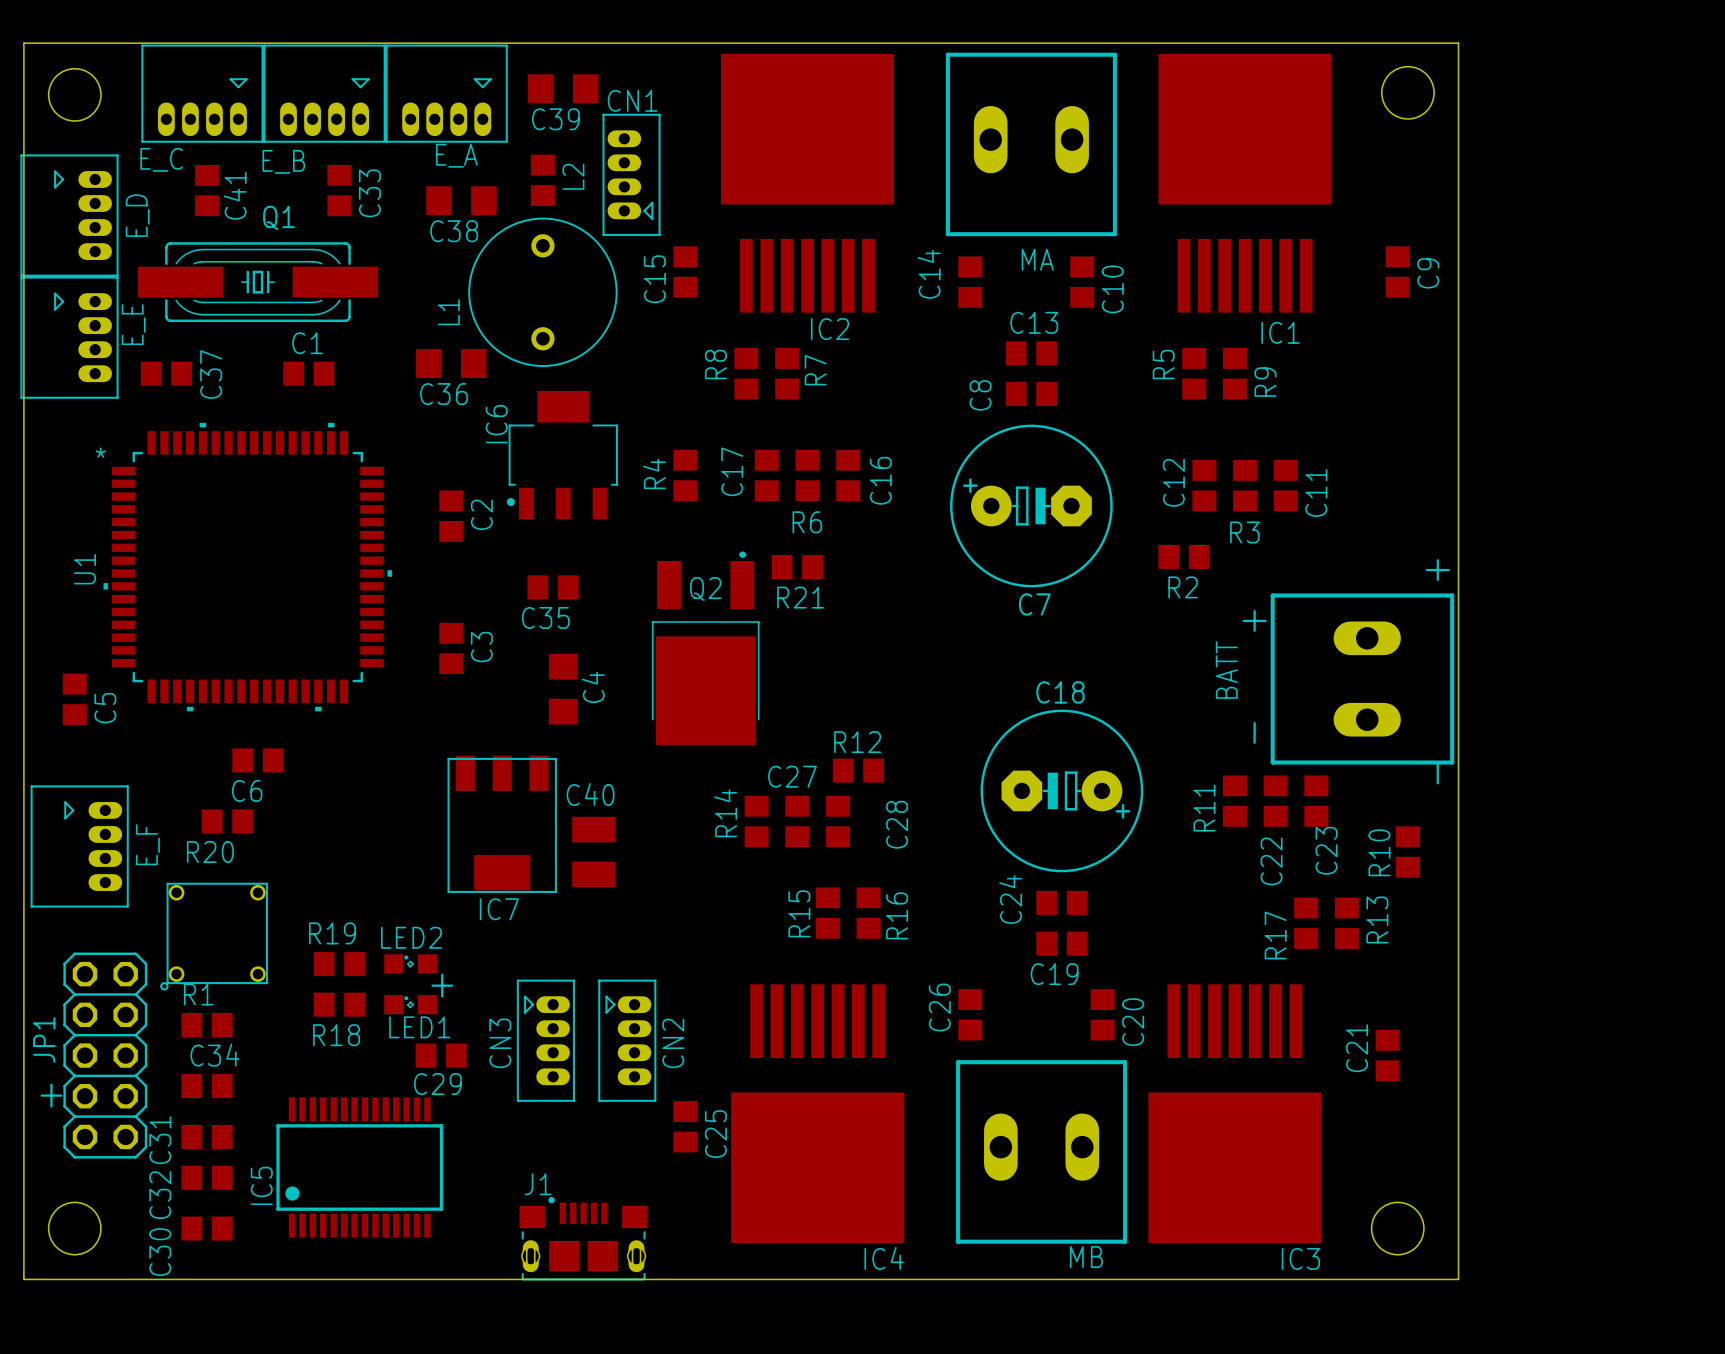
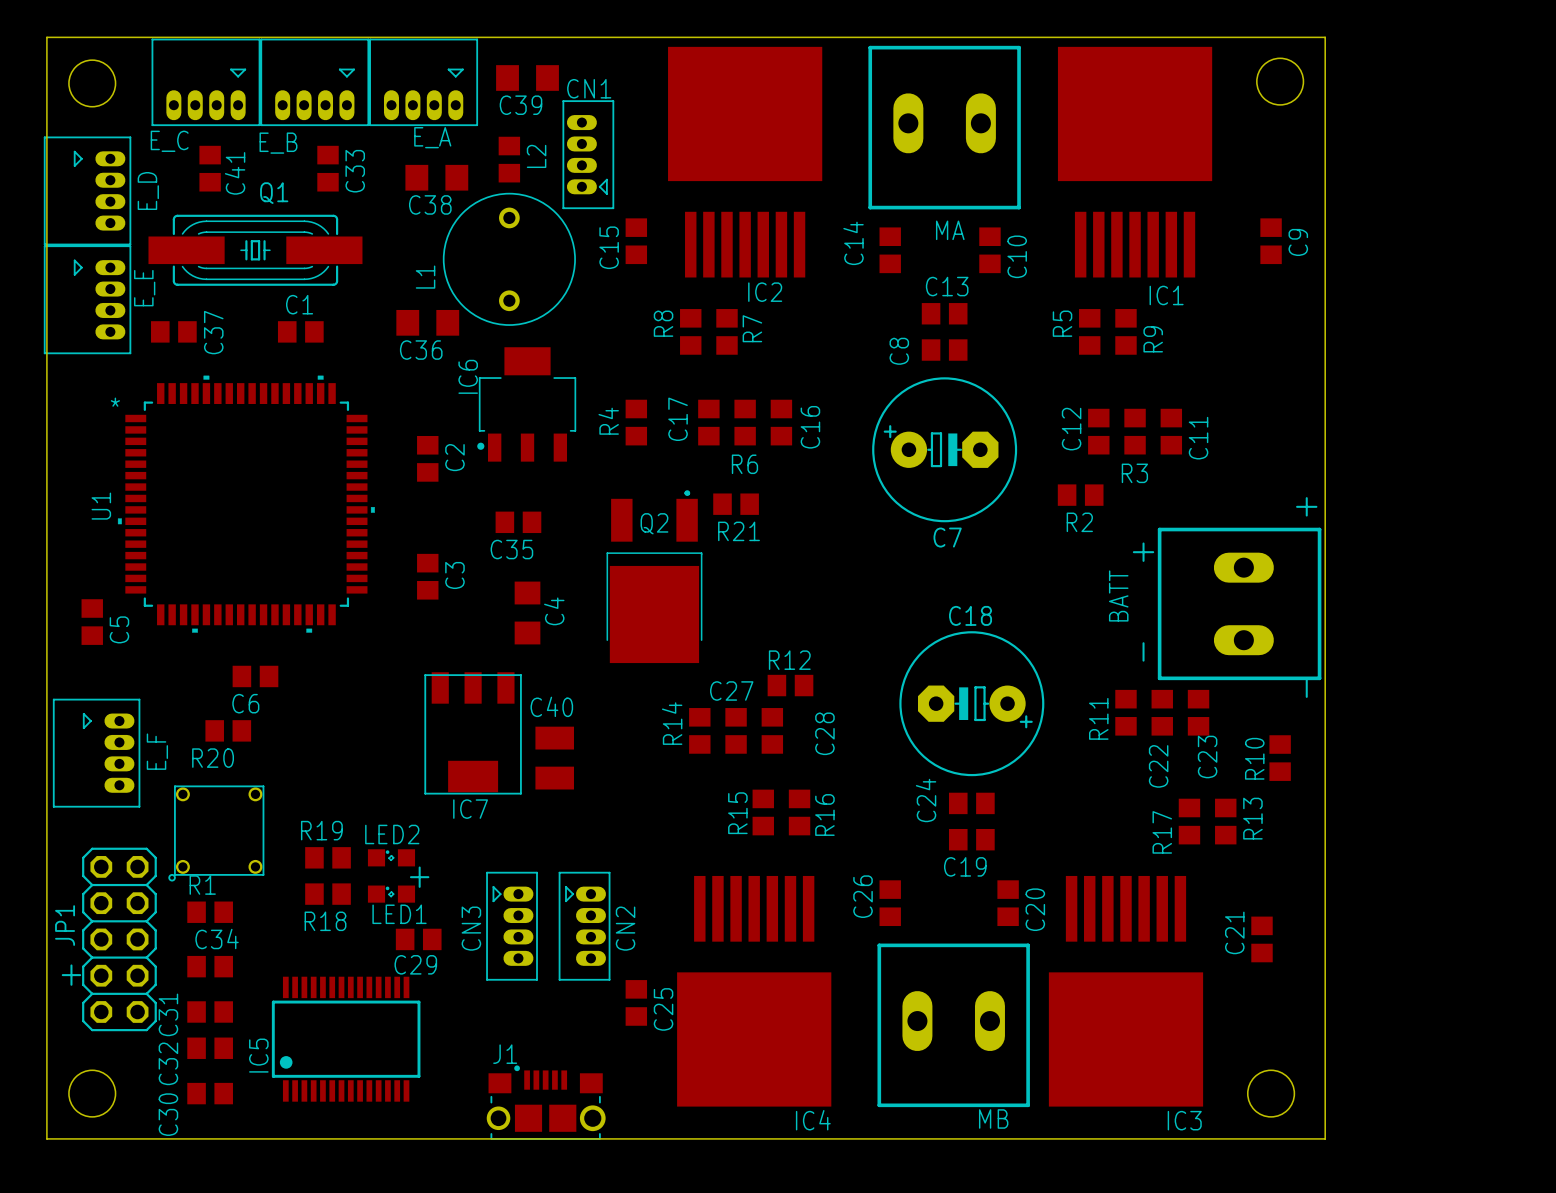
J1 footprint: [519, 1196, 648, 1281] -> [486, 1065, 606, 1140]

